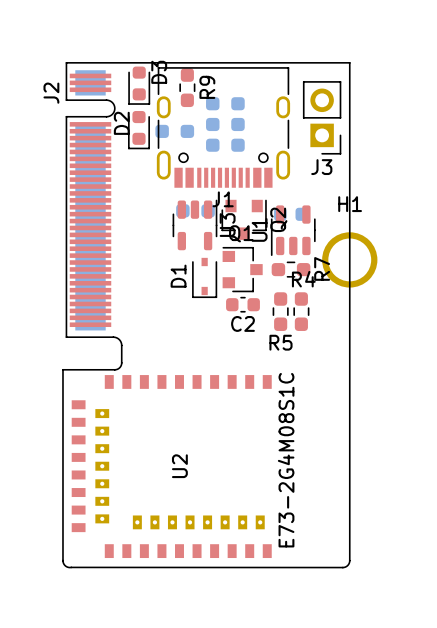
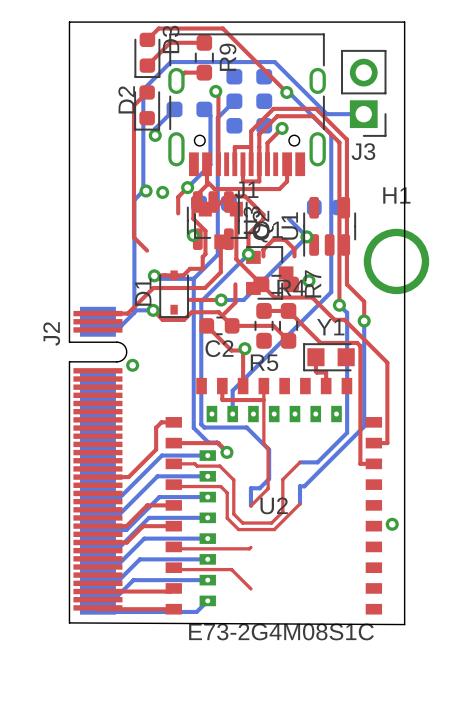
top track: none -> (147, 39) (158, 28) (222, 28) (286, 92)
top track: none -> (204, 42) (170, 42) (147, 65)
board edge: (106, 100) (66, 100) (66, 62) (349, 62) (349, 560) (346, 566) (69, 567) (63, 563) (62, 369) (115, 369) (121, 363) (121, 344) (116, 337) (66, 337) (66, 116) (109, 116) (113, 112) (114, 107) (111, 101) (106, 100) -> (116, 342) (69, 342) (69, 22) (404, 22) (404, 624) (69, 622) (69, 361) (120, 361) (125, 356) (126, 350) (122, 344) (116, 342)
top track: none -> (204, 72) (184, 72) (176, 80)
top track: none -> (215, 91) (218, 94) (218, 164)
via: none -> (215, 91)
top track: none -> (147, 92) (133, 105) (133, 237) (147, 250)
bottom track: none -> (286, 92) (288, 92) (331, 134) (331, 292) (232, 390) (232, 414)
via: none -> (286, 92)
bottom track: none -> (234, 101) (217, 117) (217, 254) (193, 278)
bottom track: none -> (174, 109) (155, 128) (155, 135)
bottom track: none -> (204, 109) (210, 115) (210, 164) (187, 187)
bottom track: none -> (363, 114) (326, 114) (274, 62) (170, 62) (143, 89) (143, 190)
top track: none -> (282, 128) (267, 143) (267, 164)
via: none -> (282, 128)
via: none -> (155, 135)
top track: none -> (251, 147) (234, 147) (234, 164)
top track: none -> (207, 164) (207, 185) (193, 198) (193, 218) (205, 230) (205, 254) (202, 256) (202, 268) (190, 268) (183, 275) (154, 275)
top track: none -> (242, 164) (242, 181) (259, 181) (259, 134) (277, 116) (313, 116) (339, 142) (339, 305)
top track: none -> (251, 164) (251, 131) (273, 108) (316, 108) (346, 139) (346, 284) (364, 301) (364, 320)
top track: none -> (287, 164) (287, 181) (279, 189) (214, 189) (207, 181)
top track: none -> (187, 187) (178, 197) (178, 213)
via: none -> (187, 187)
J2 position: (90, 200) -> (97, 460)
bottom track: none -> (143, 190) (134, 199) (134, 312) (121, 325) (97, 325)
via: none -> (146, 190)
via: none -> (162, 192)
top track: none -> (205, 209) (217, 209) (217, 206) (226, 196) (245, 196) (263, 214) (263, 219) (248, 234) (248, 254)
top track: none -> (236, 209) (236, 259) (274, 297) (312, 297) (334, 319) (344, 319) (387, 362) (387, 443) (373, 443)
Q2 position: (244, 219) -> (220, 225)
bottom track: none -> (288, 218) (306, 236) (243, 300) (221, 300)
via: none -> (193, 235)
via: none -> (306, 236)
top track: none -> (220, 241) (220, 272) (205, 288) (153, 288) (127, 313) (97, 313)
bottom track: none -> (248, 254) (201, 301) (201, 424) (204, 427) (246, 427) (269, 449) (269, 478) (259, 488) (250, 488) (250, 505)
via: none -> (248, 254)
top track: none -> (263, 256) (263, 249) (273, 239) (284, 239) (294, 249) (294, 256)
R7 position: (291, 269) -> (276, 284)
bottom track: none -> (154, 275) (157, 278) (193, 278)
via: none -> (154, 275)
bottom track: none -> (193, 278) (193, 427) (208, 442) (217, 442) (230, 455)
via: none -> (309, 280)
D1 position: (204, 277) -> (174, 294)
top track: none -> (235, 284) (235, 302) (222, 315)
top track: none -> (190, 299) (221, 300)
via: none -> (221, 300)
bottom track: none -> (339, 305) (347, 312) (347, 432) (317, 462) (300, 462)
via: none -> (339, 305)
bottom track: none -> (134, 310) (153, 310)
top track: none -> (153, 310) (162, 319) (184, 319) (191, 312) (218, 312) (222, 315)
via: none -> (153, 310)
top track: none -> (264, 310) (288, 310) (320, 342) (357, 342) (360, 346) (360, 463) (373, 463)
C2 position: (242, 304) -> (219, 325)
top track: none -> (222, 315) (232, 325) (273, 325) (288, 340)
bottom track: none -> (364, 320) (364, 426) (304, 486) (300, 486) (300, 503)
via: none -> (364, 320)
R5 position: (280, 311) -> (264, 325)
R4 position: (301, 311) -> (288, 325)
top track: none -> (206, 325) (231, 350) (243, 350) (243, 386)
via: none -> (244, 348)
top track: none -> (315, 357) (315, 371) (326, 372) (326, 386)
Y1: none -> (328, 357)
via: none -> (132, 365)
top track: none -> (222, 386) (222, 400) (263, 400)
top track: none -> (263, 386) (263, 443) (268, 448) (268, 488) (250, 505)
top track: none -> (173, 422) (161, 422) (156, 427) (156, 449) (128, 477) (97, 477)
top track: none -> (173, 443) (218, 443) (226, 452)
via: none -> (226, 452)
bottom track: none -> (207, 455) (161, 455) (120, 497) (97, 497)
top track: none -> (300, 462) (282, 479) (282, 511) (271, 523) (242, 523) (233, 514) (233, 480) (219, 466) (173, 463)
bottom track: none -> (207, 476) (157, 476) (120, 513) (97, 513)
top track: none -> (173, 484) (175, 486) (220, 486) (227, 492) (227, 518) (238, 529) (274, 529) (300, 503)
bottom track: none -> (207, 497) (159, 497) (126, 530) (111, 530)
top track: none -> (173, 505) (147, 505) (126, 526) (97, 526)
U2 rotation: 0° (171, 466) -> 90° clockwise (273, 496)
bottom track: none -> (207, 517) (149, 517) (120, 546) (97, 546)
via: none -> (392, 524)
top track: none -> (173, 526) (143, 526) (126, 542) (97, 542)
bottom track: none -> (207, 538) (144, 538) (120, 562) (97, 562)
top track: none -> (173, 546) (175, 548) (250, 547)
bottom track: none -> (207, 559) (139, 559) (120, 579) (97, 579)
top track: none -> (173, 567) (175, 569) (231, 569) (250, 588)
bottom track: none -> (207, 580) (133, 580) (118, 595) (97, 595)
top track: none -> (173, 588) (170, 591) (97, 591)
bottom track: none -> (207, 600) (196, 611) (97, 611)
top track: none -> (97, 607) (173, 609)

